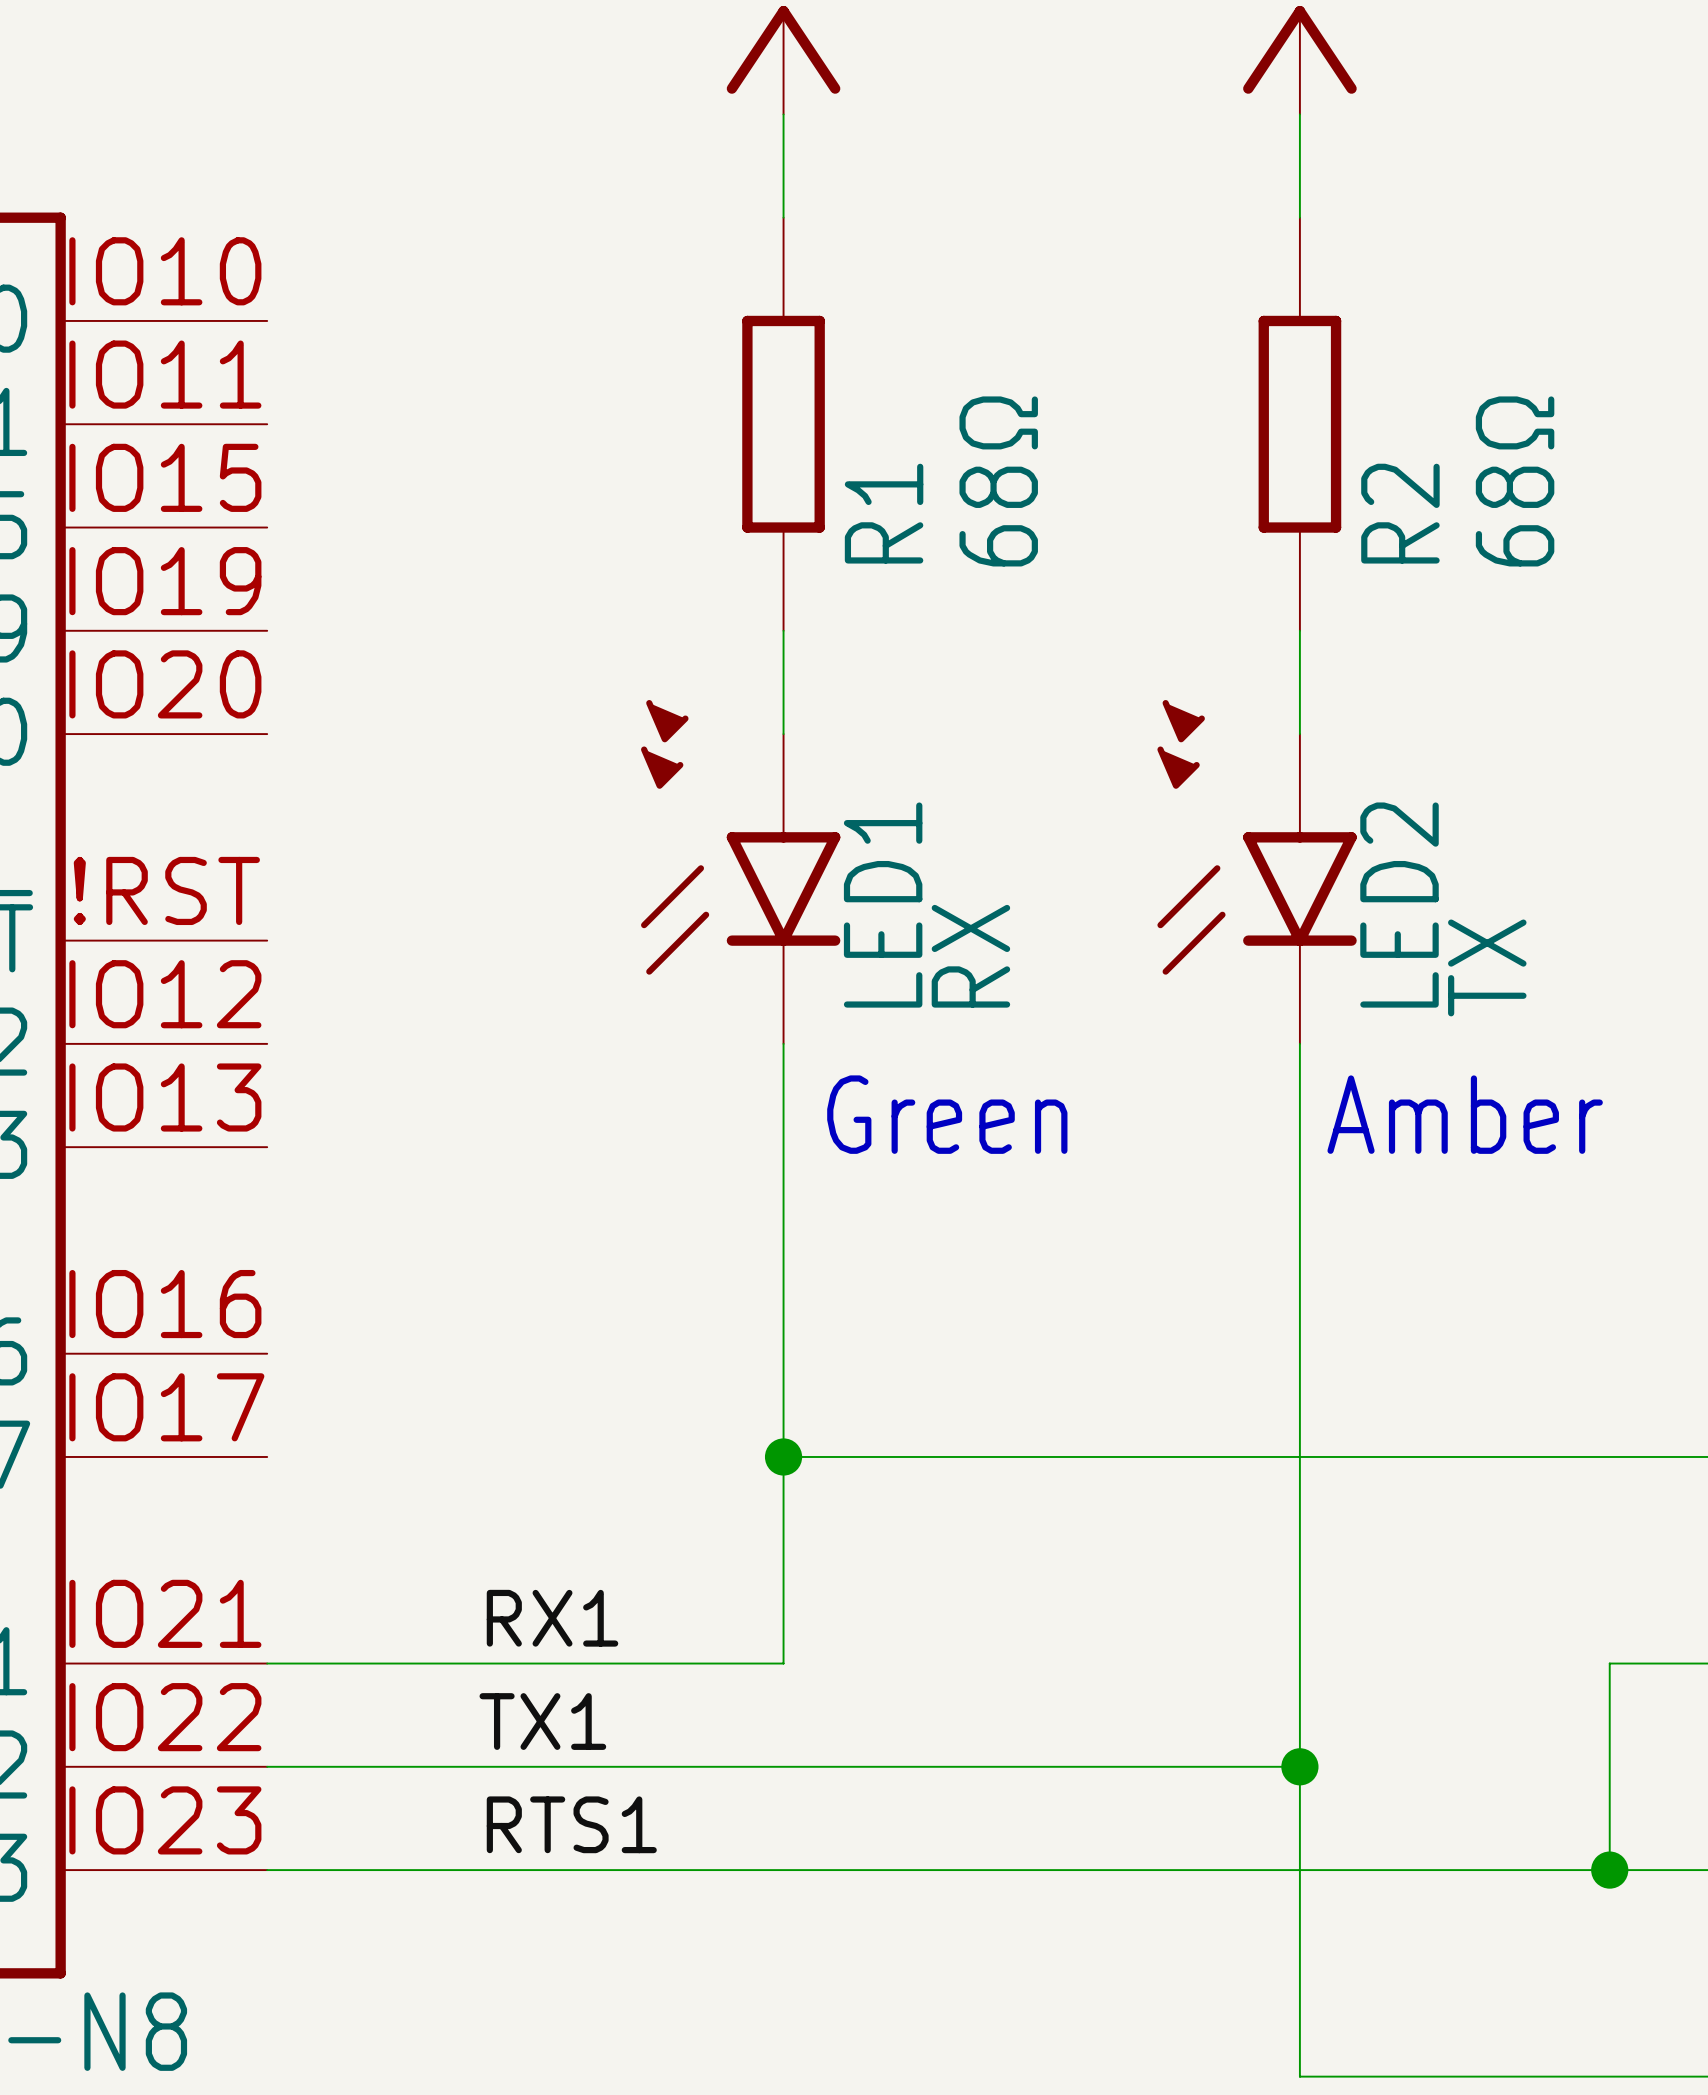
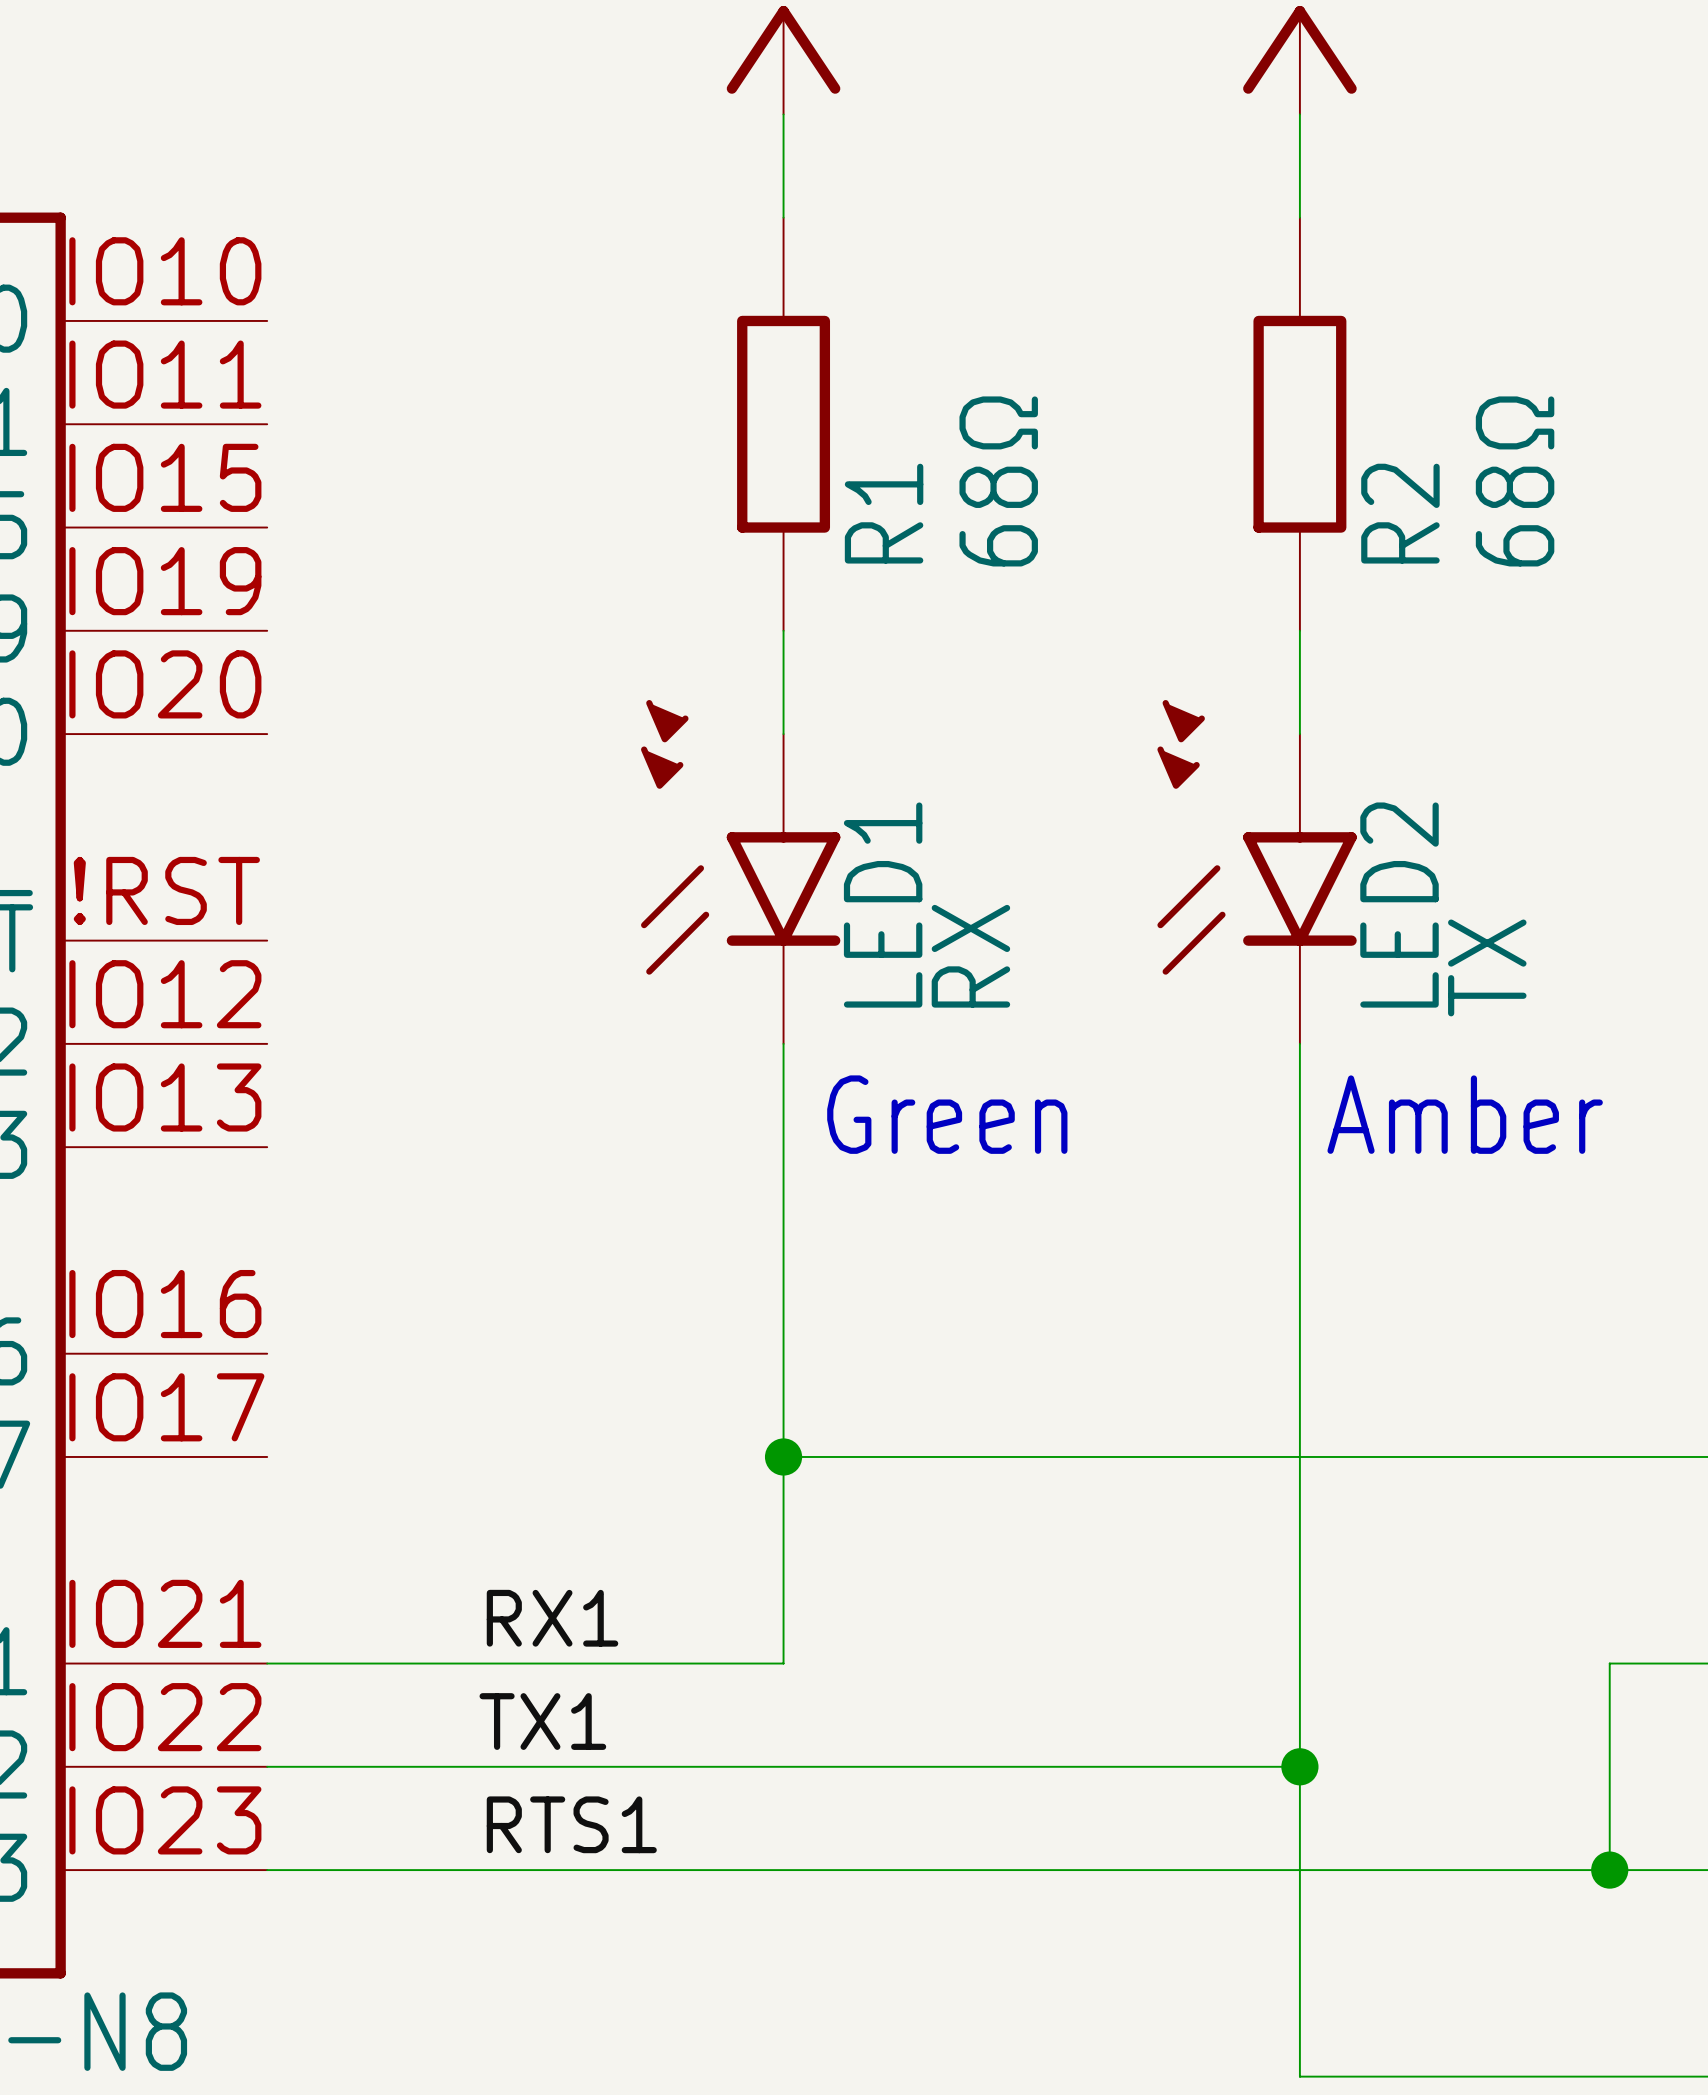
R1 symbol: [742, 217, 825, 631] -> [737, 217, 831, 631]
R2 symbol: [1258, 217, 1342, 631] -> [1253, 217, 1347, 631]

